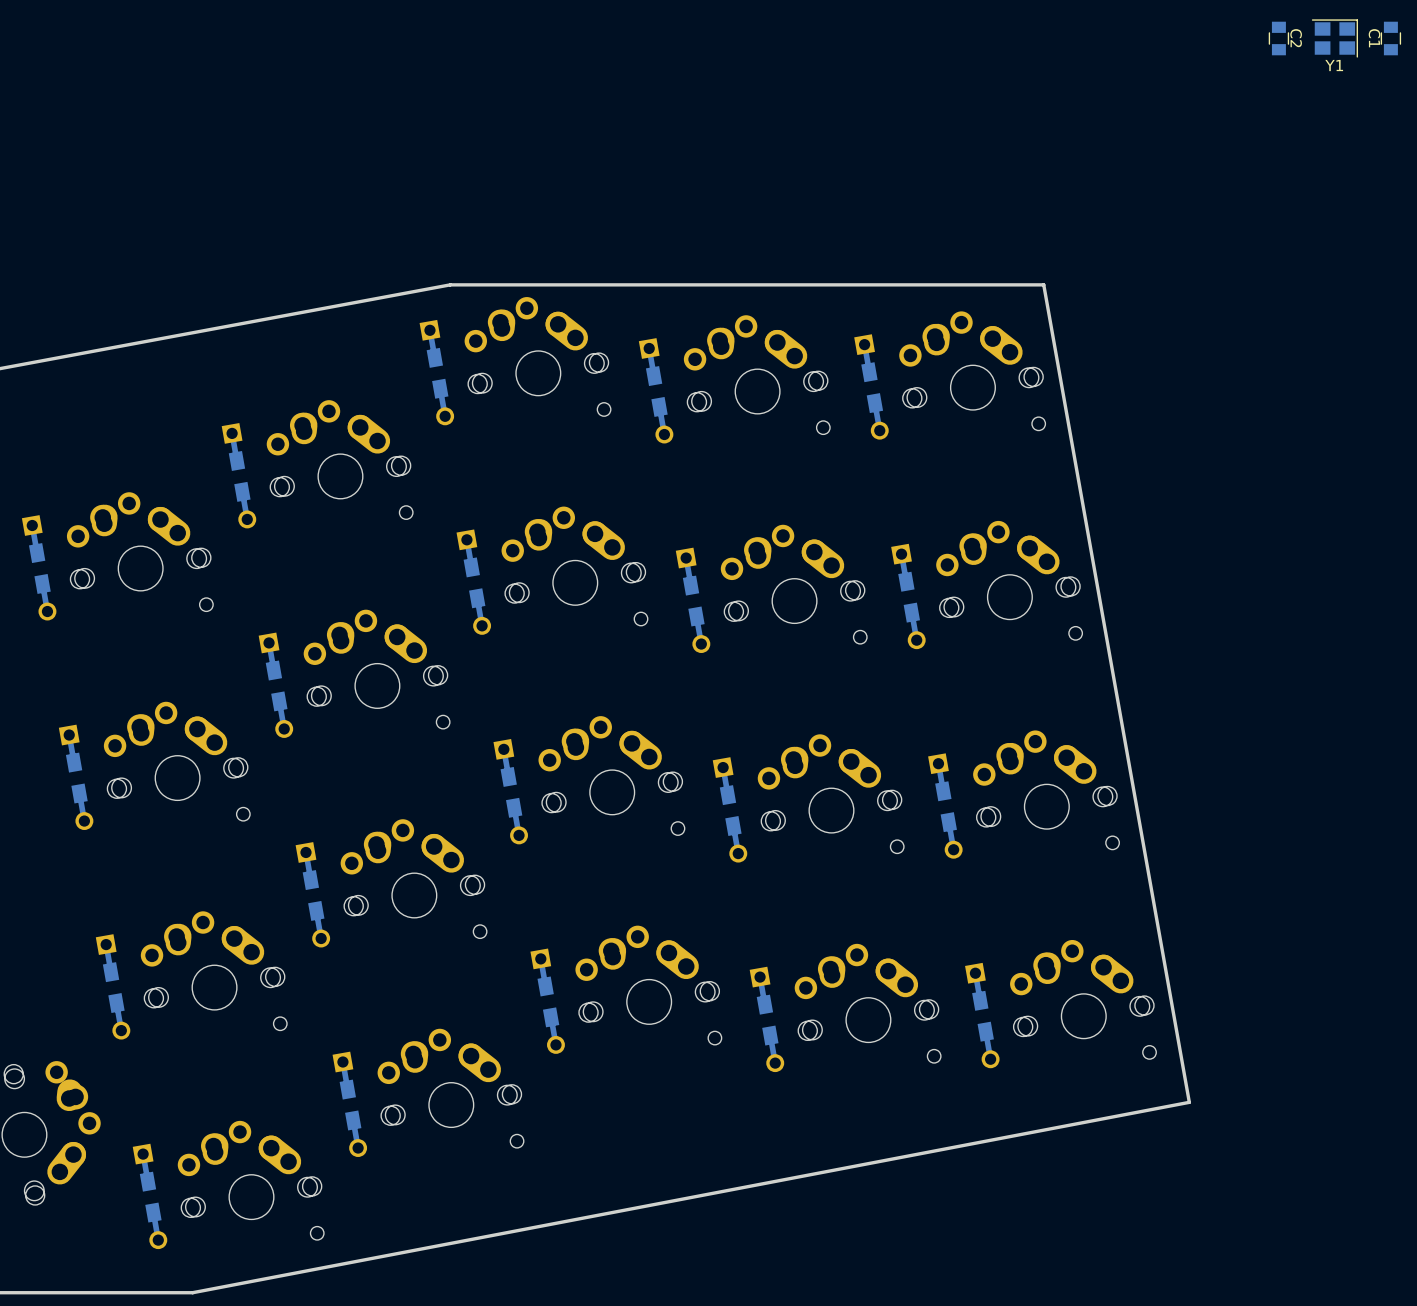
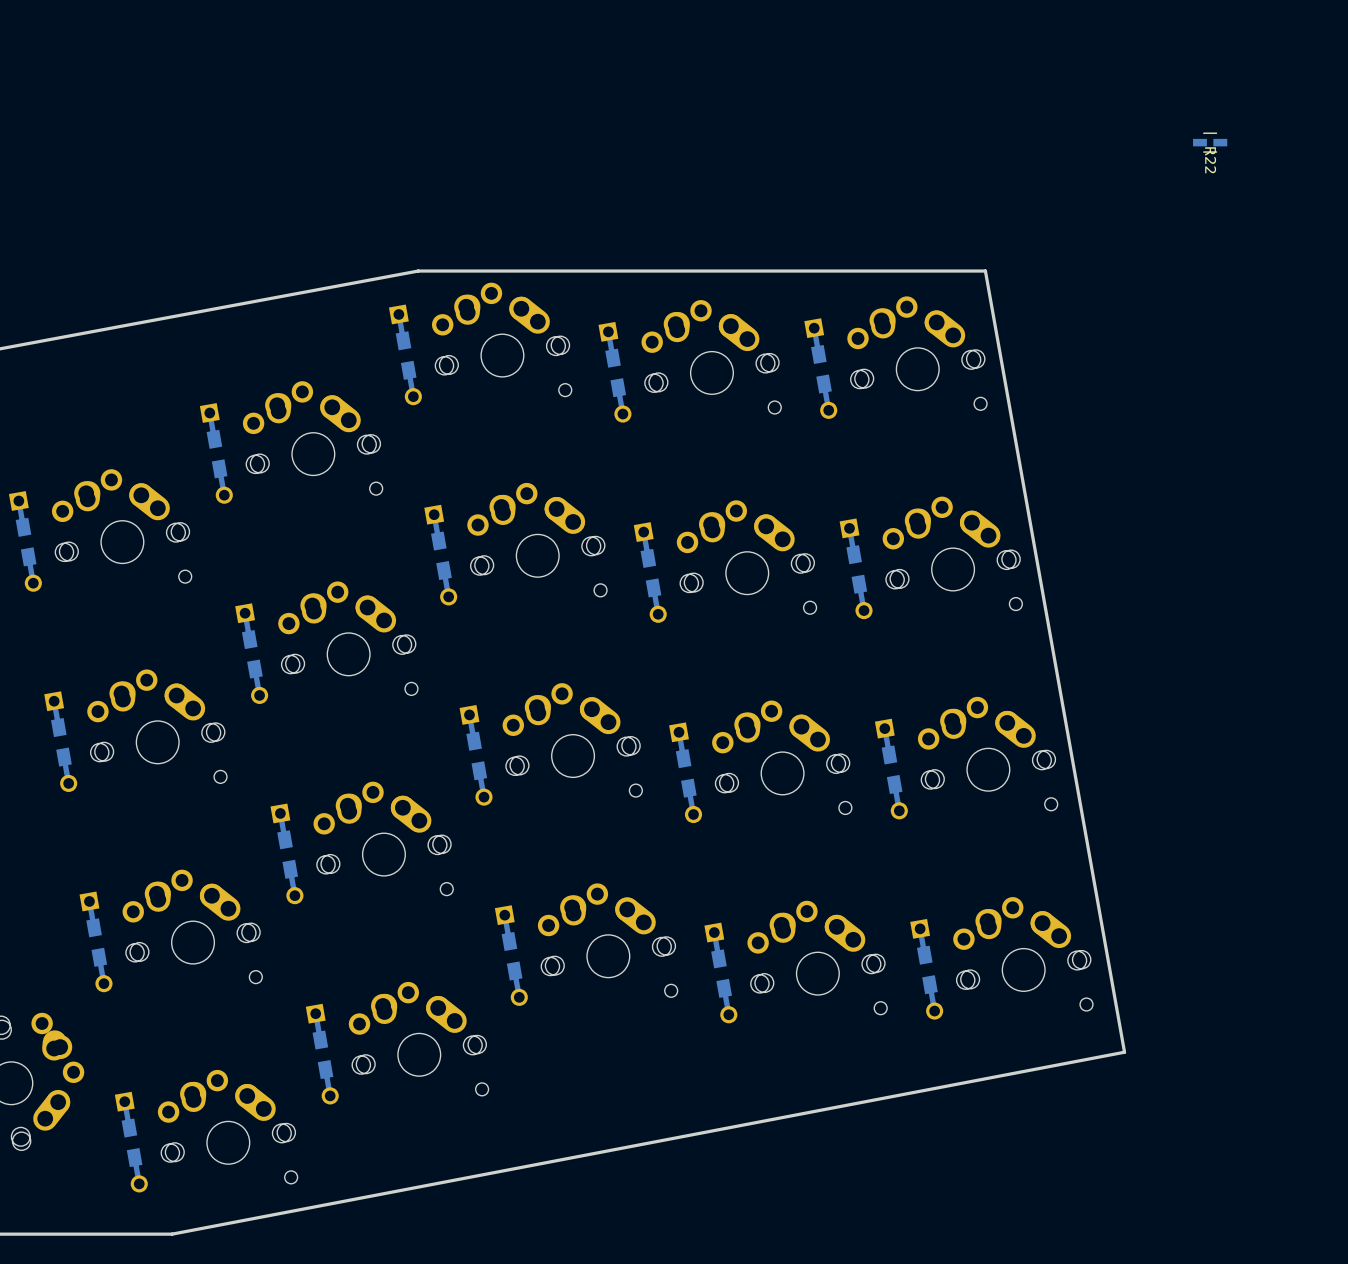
C2: (1278, 38) -> none
Y1: (1334, 38) -> none
C1: (1390, 38) -> none
R22: none -> (1210, 142)

